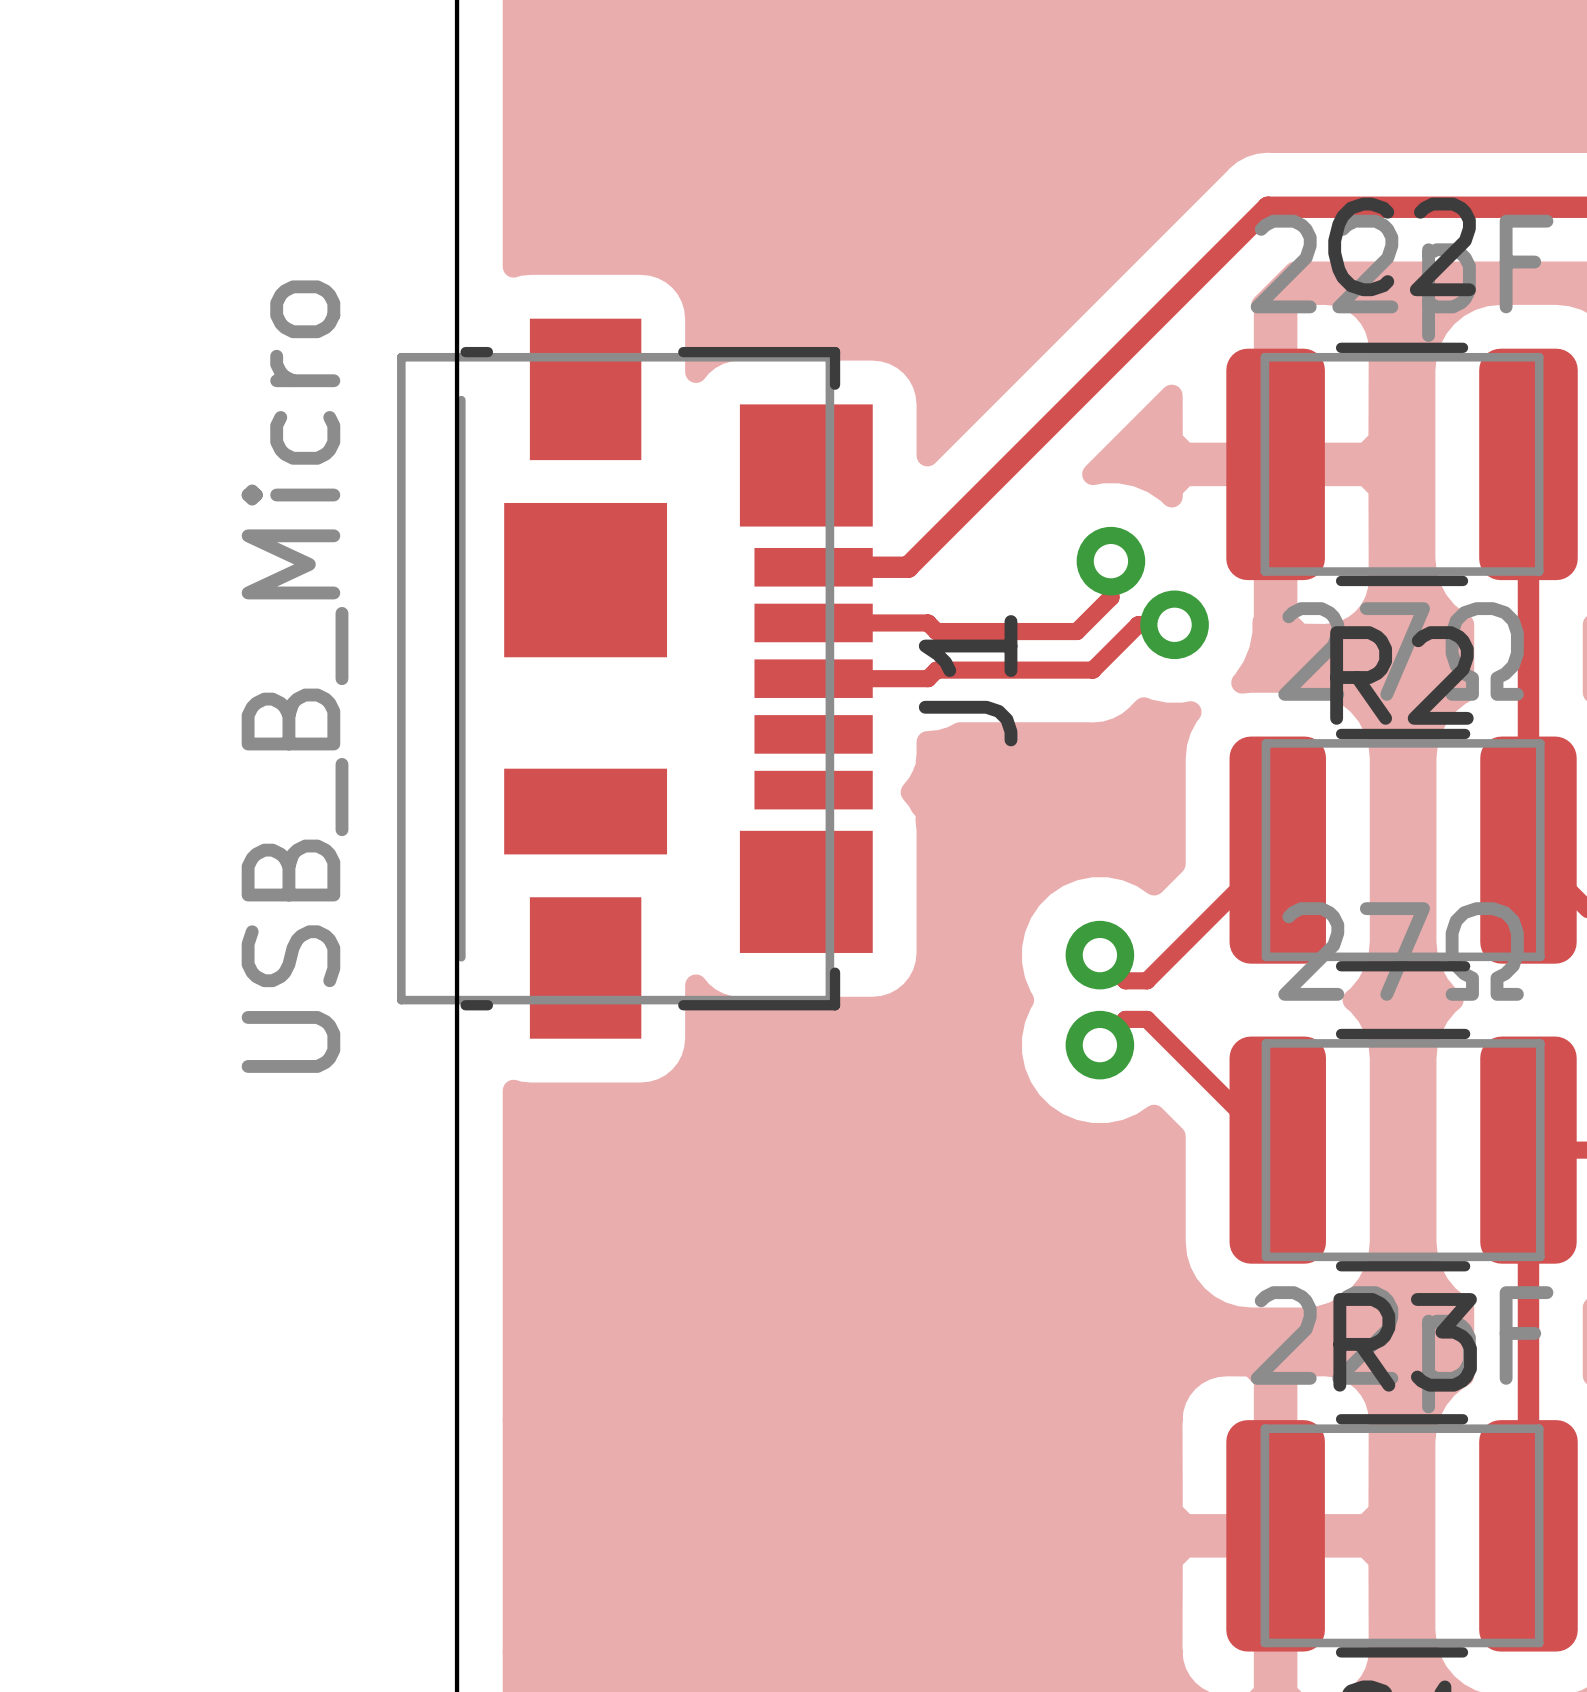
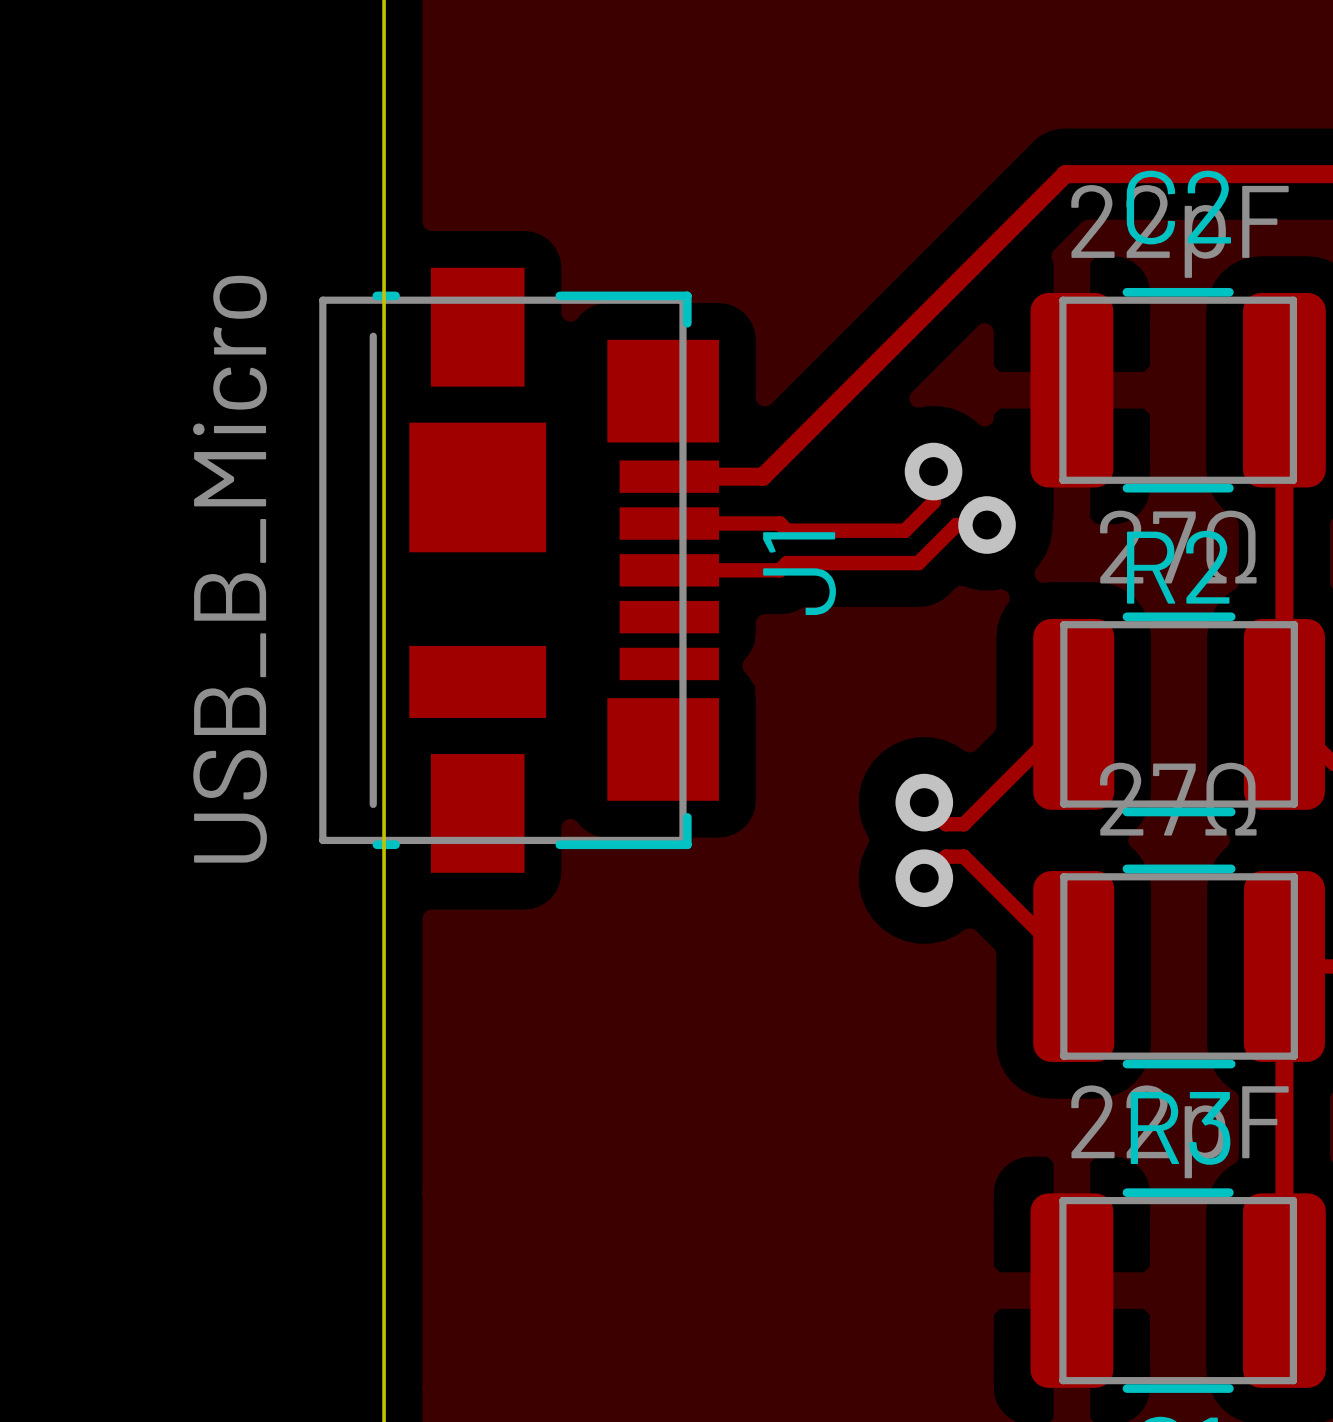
J1 position: (634, 678) -> (519, 570)

